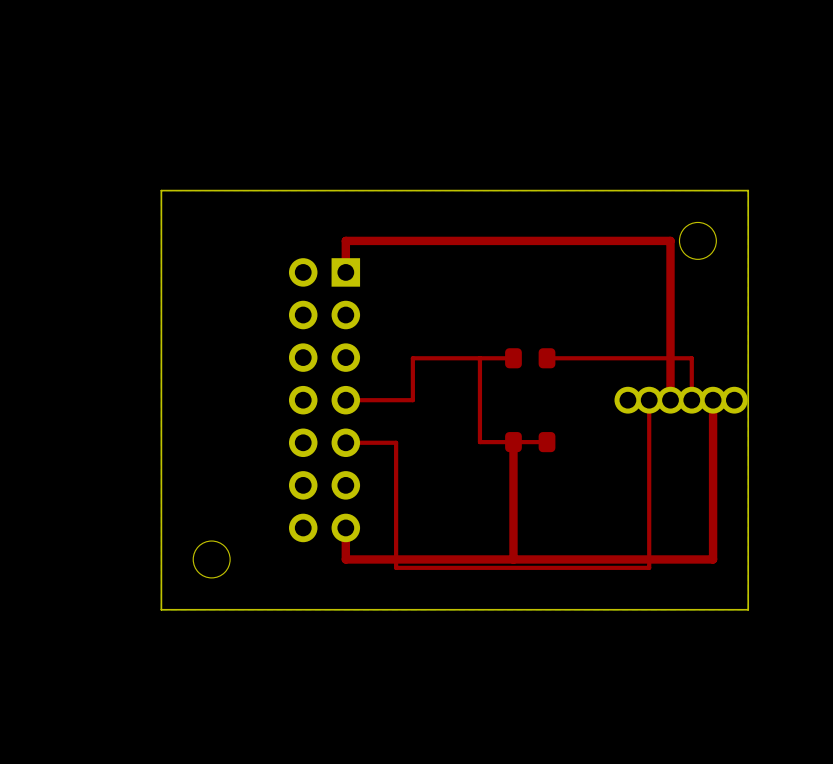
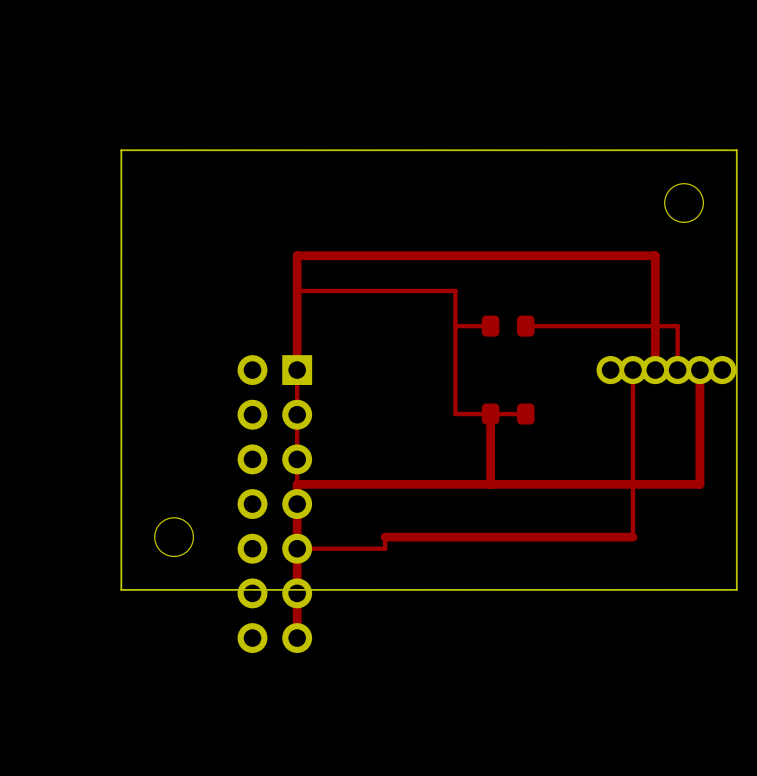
top track: (345, 272) (345, 240) (670, 240) (670, 291) -> (297, 370) (297, 255) (655, 255)
top track: (479, 358) (412, 358) (412, 400) (345, 400) -> (455, 326) (455, 290) (297, 290) (297, 504)
part position: (324, 400) -> (274, 504)
top track: (345, 442) (396, 442) (396, 567) (649, 567) (649, 559) (713, 559) (713, 509) -> (297, 638) (297, 484) (699, 484)
top track: (513, 509) (513, 559) -> none
top track: (345, 527) (345, 559) (412, 559) -> (297, 548) (385, 548) (385, 537)

